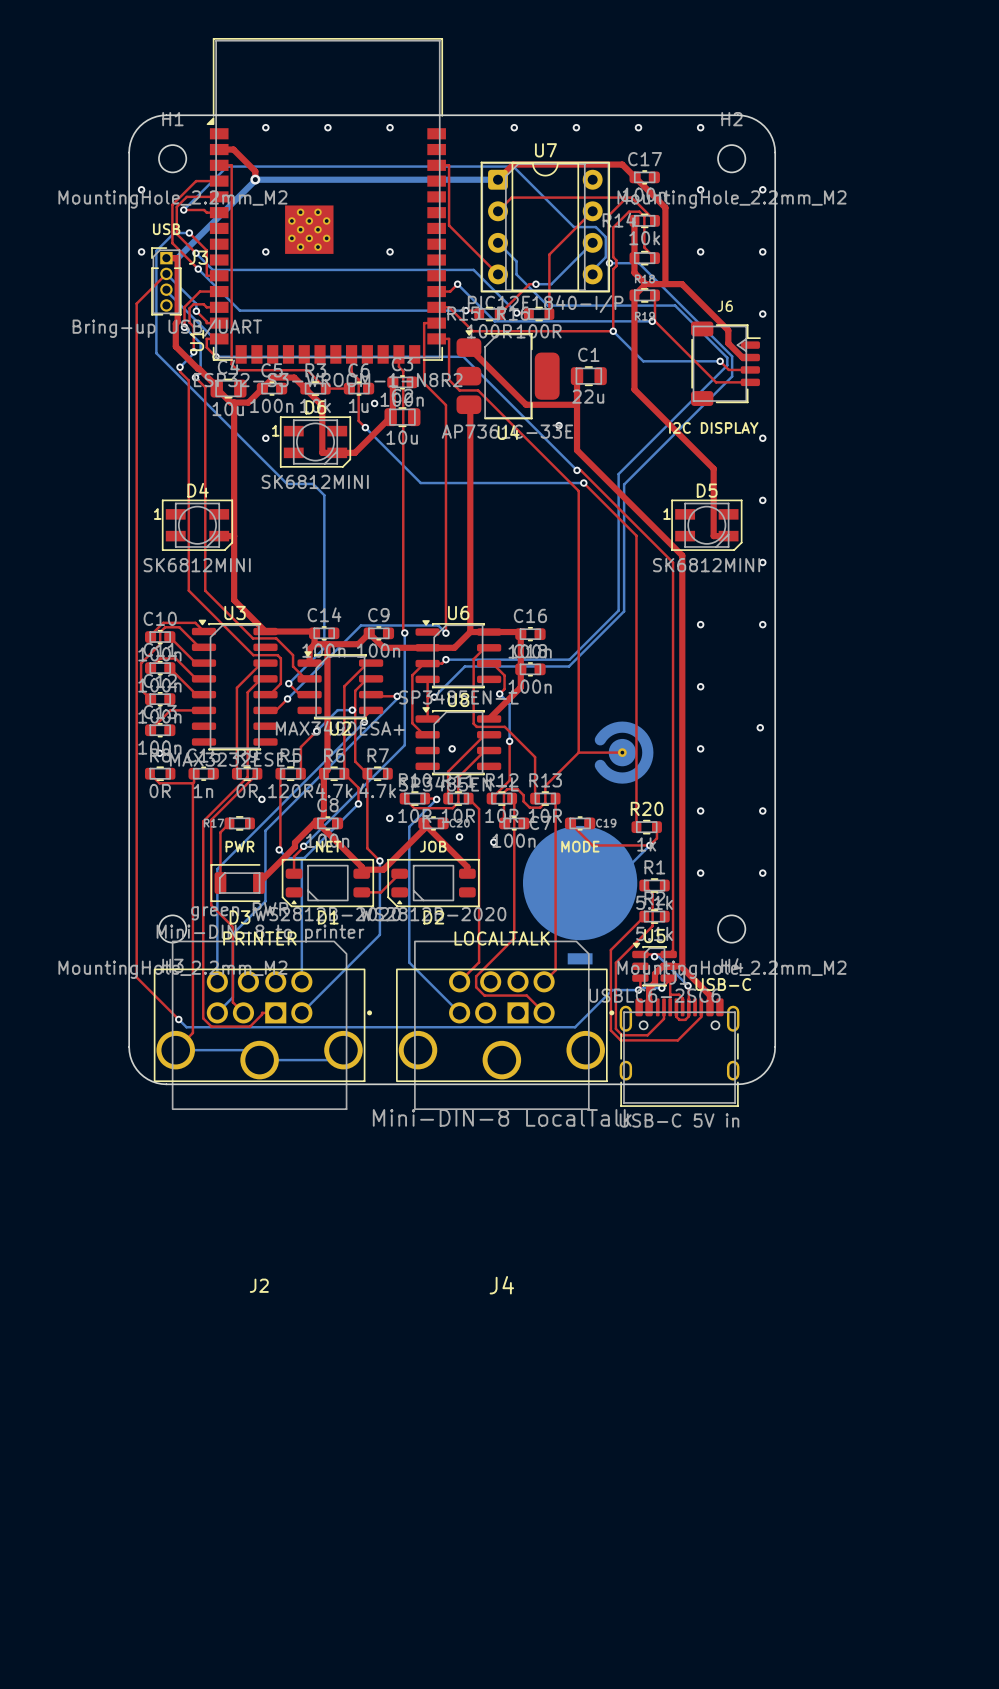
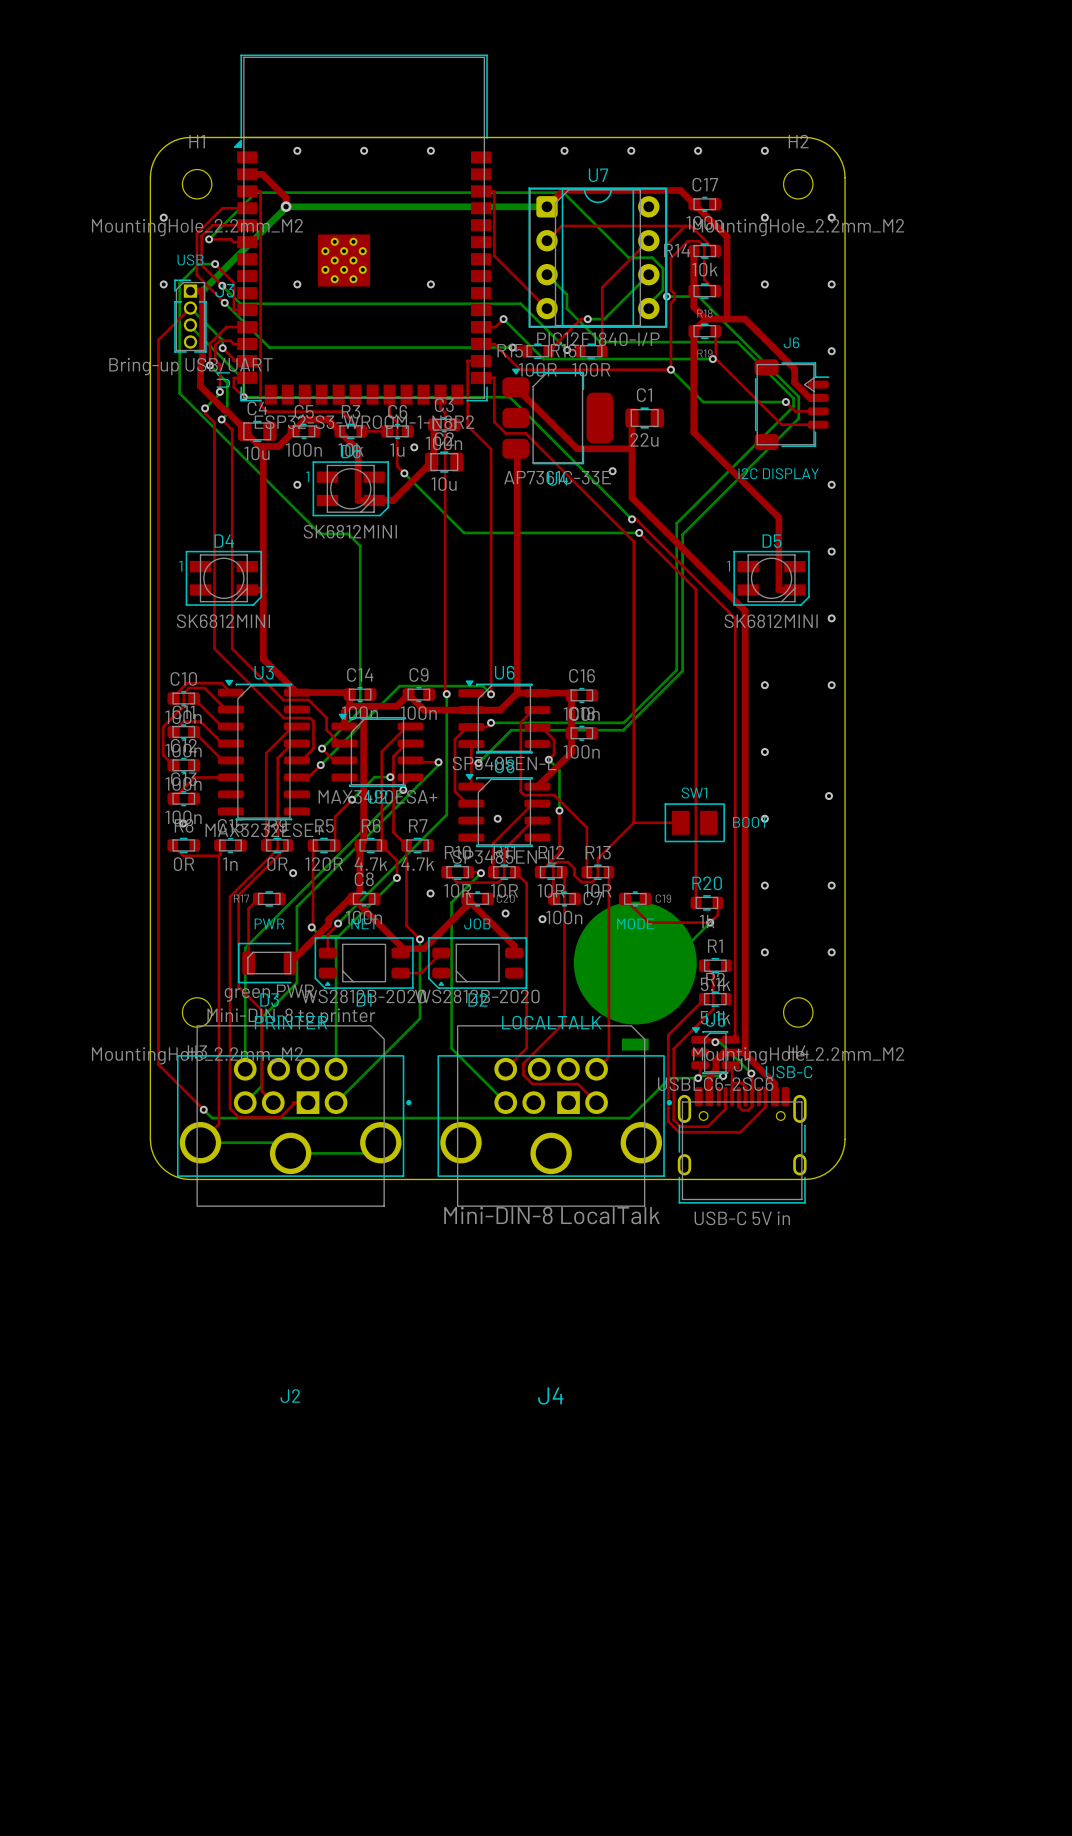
part: (624, 752) -> none
SW1: none -> (694, 822)

